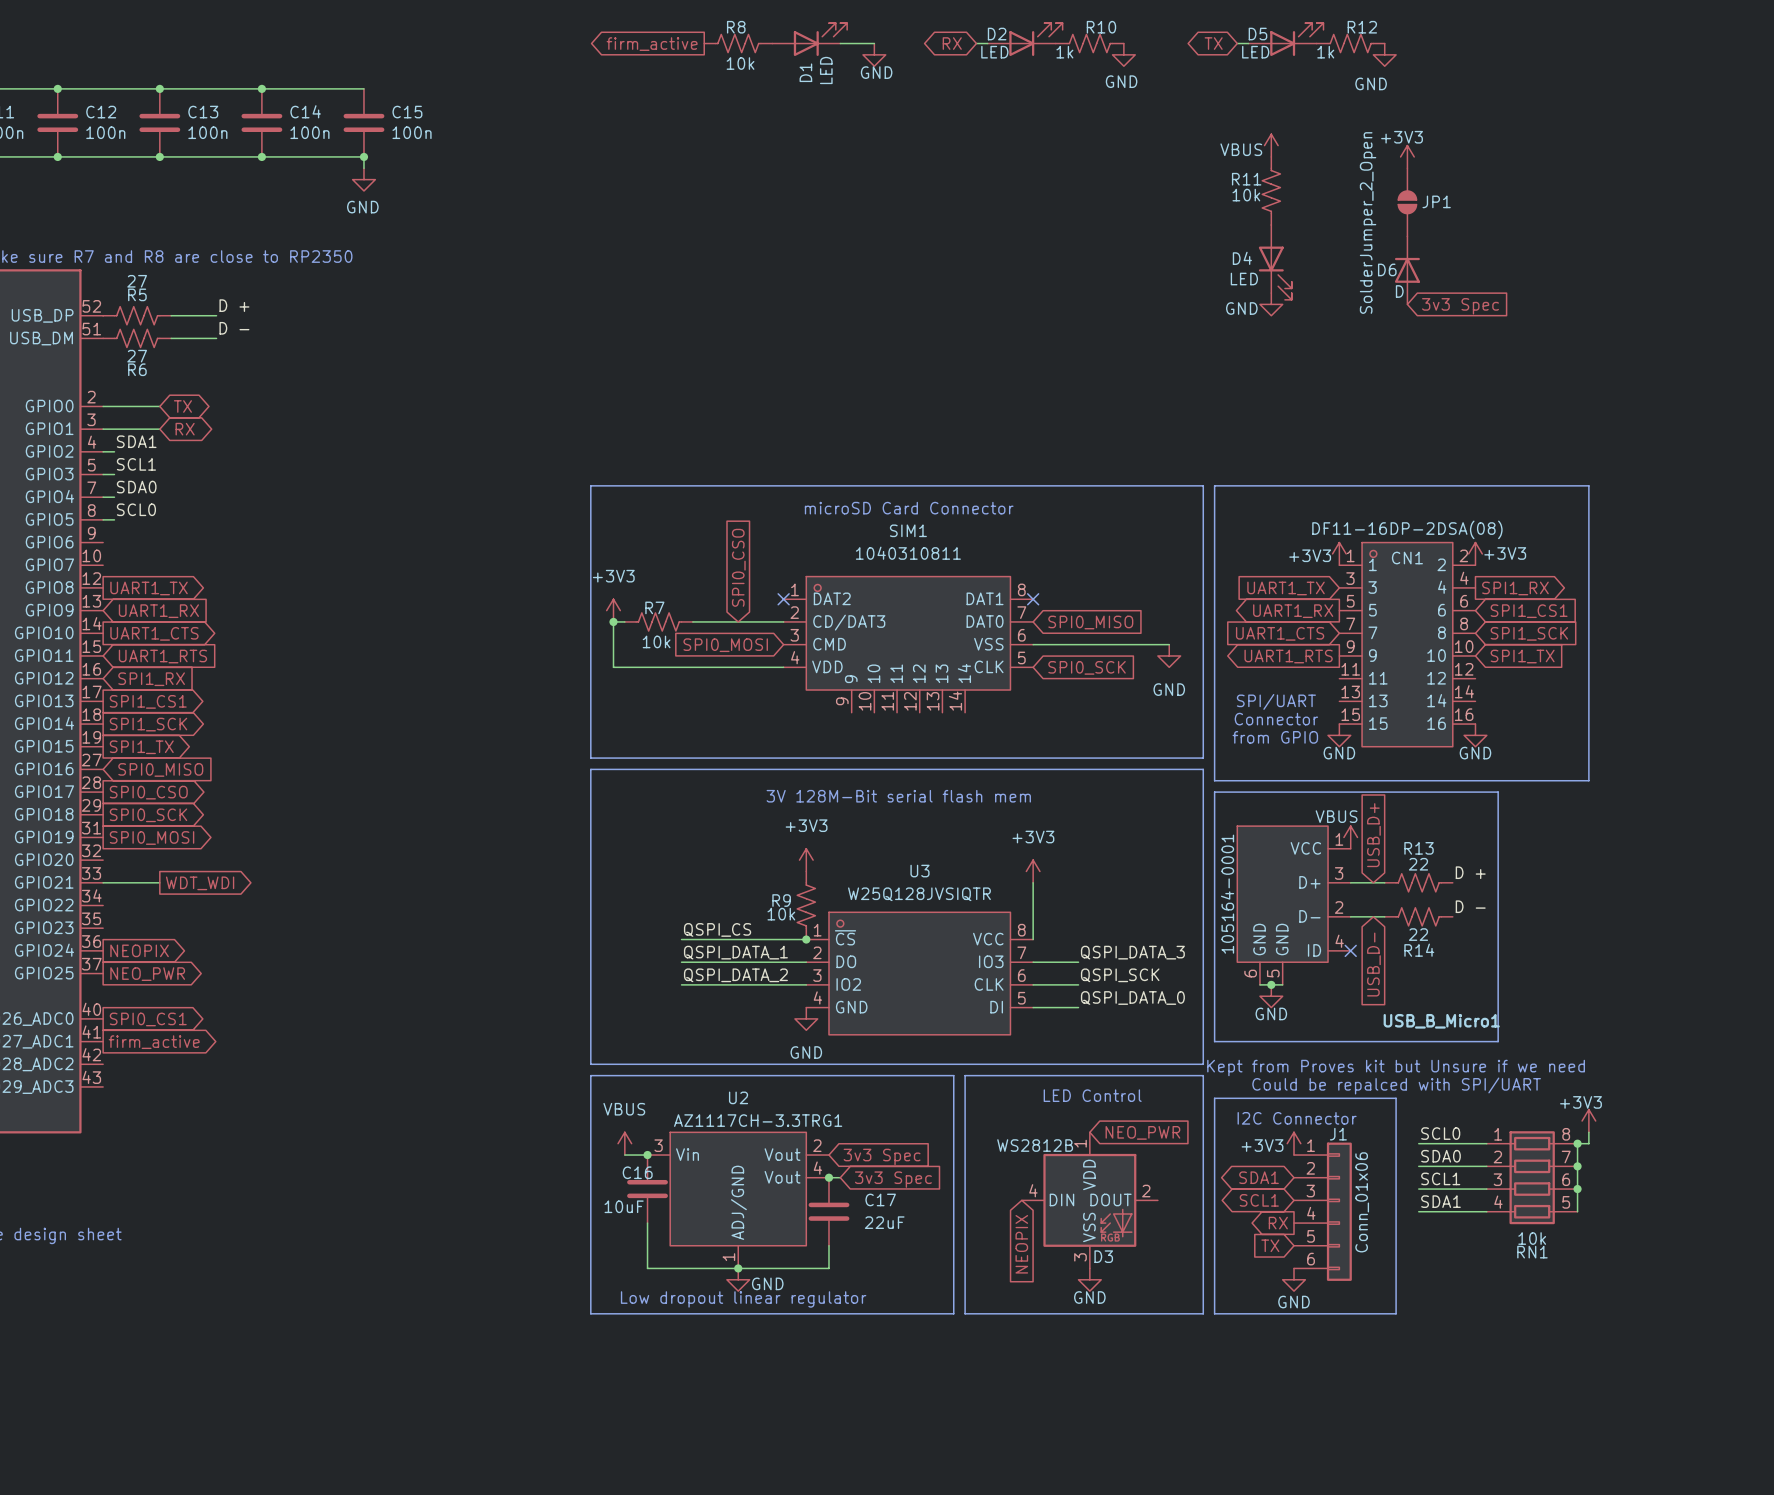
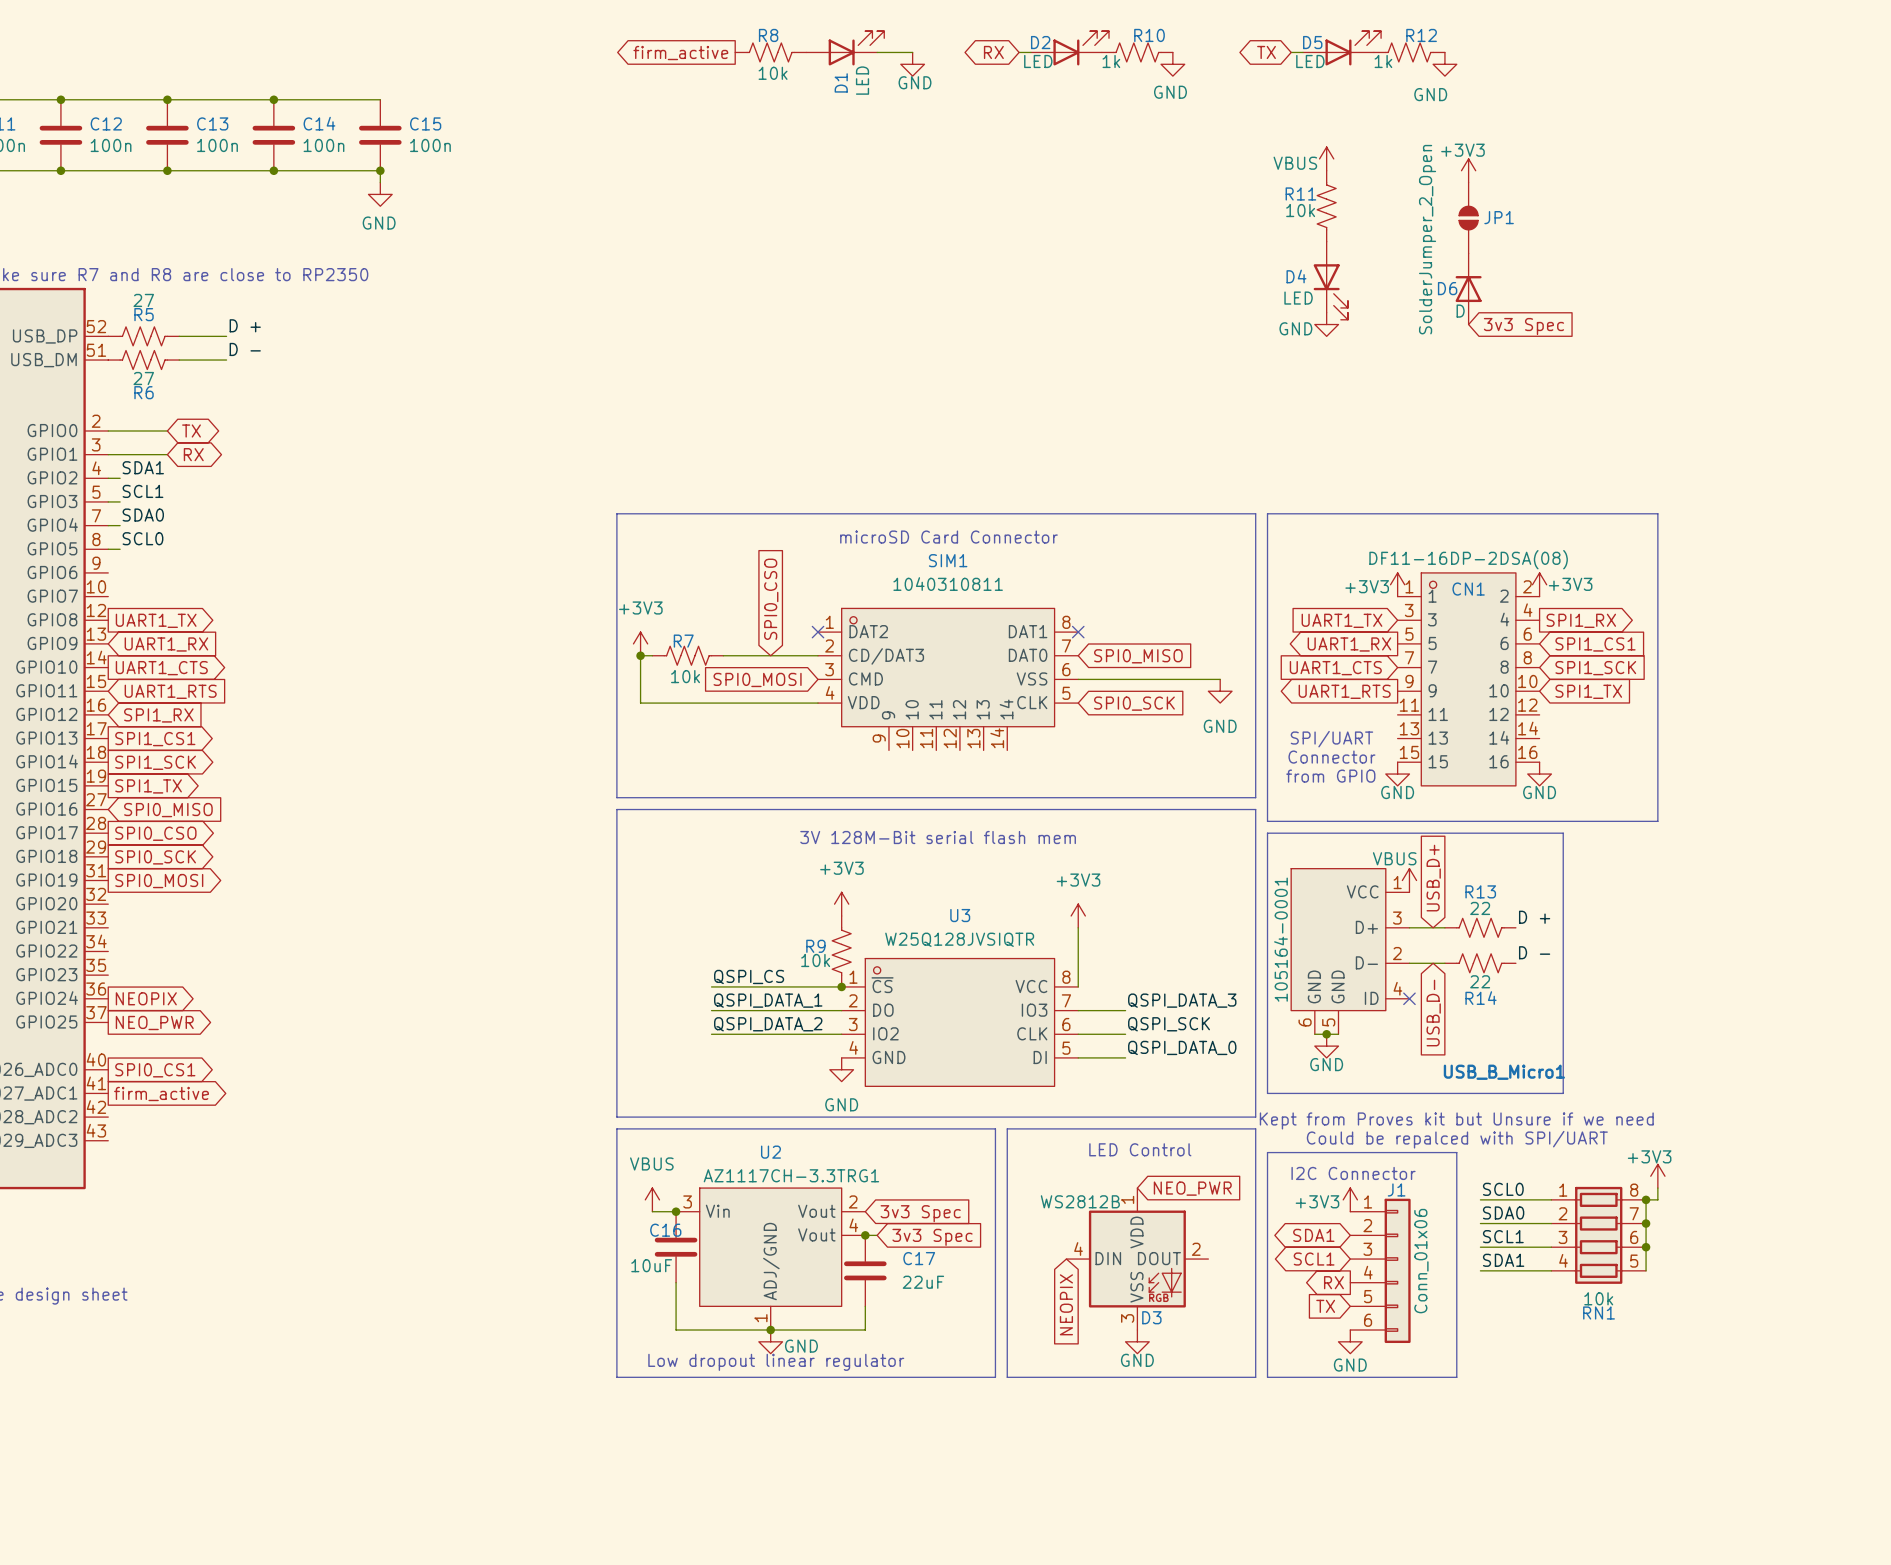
wire: (103, 882) (159, 882) -> none
global label: WDT_WDI (200, 883) -> none

